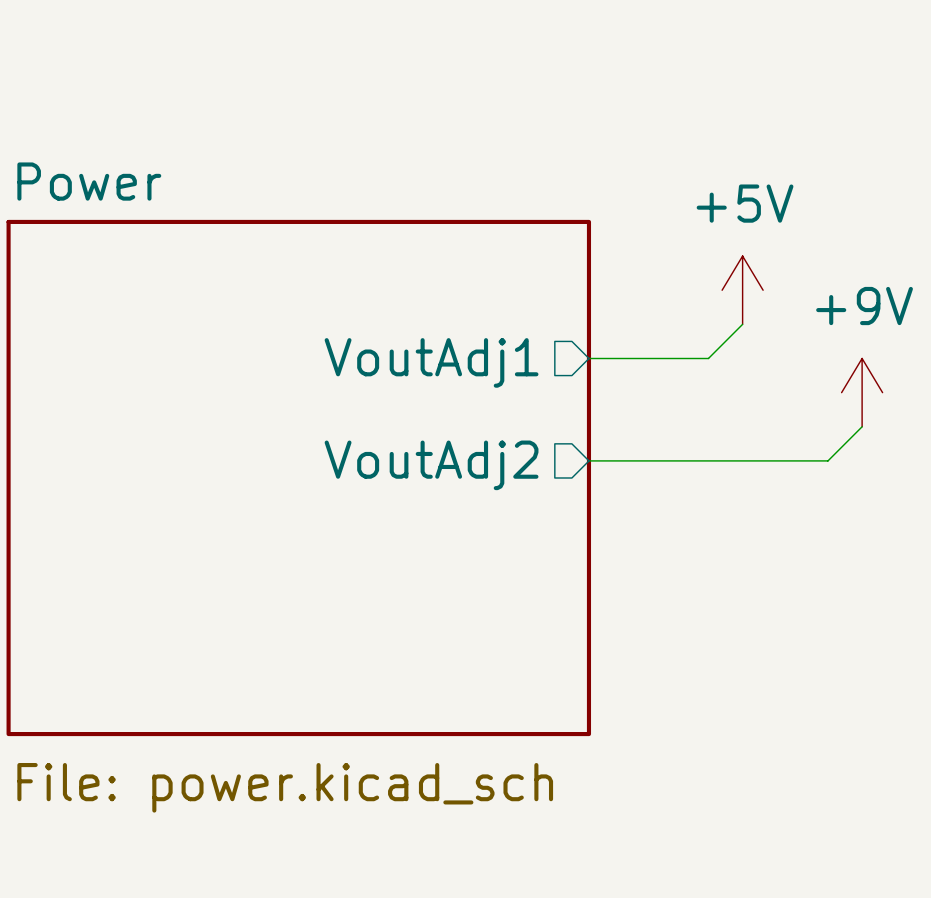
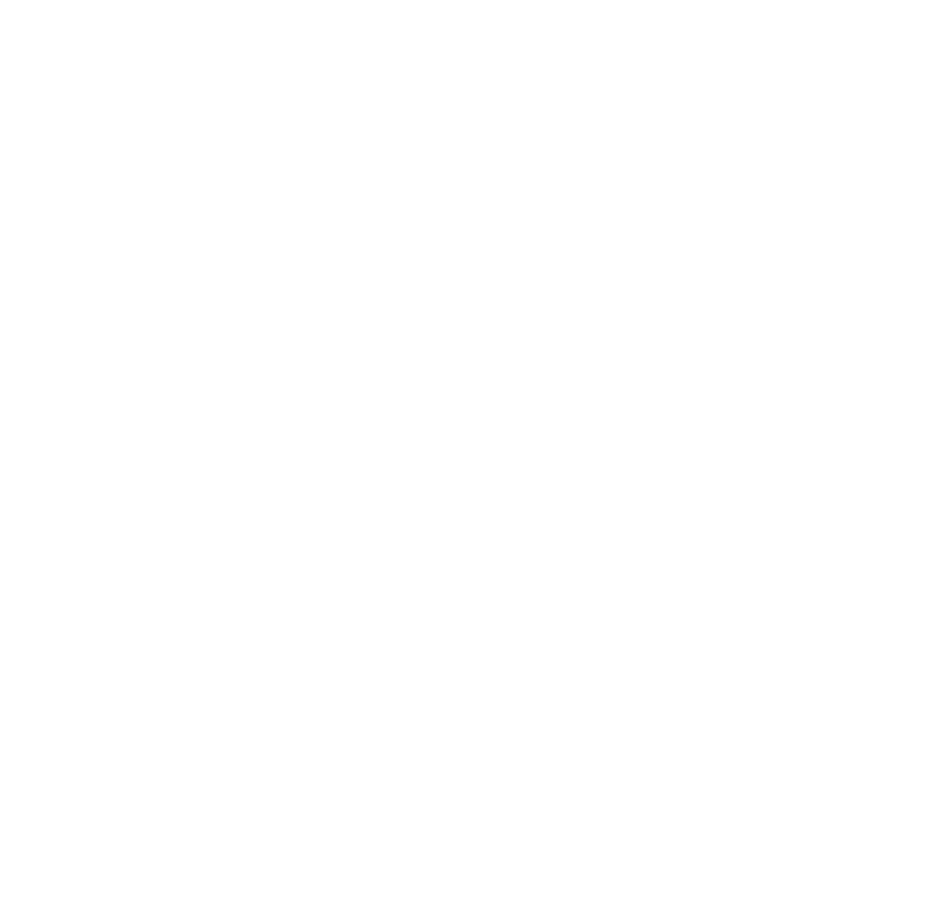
power symbol: +5V (742, 290) -> none
wire: (742, 324) (708, 358) (588, 358) -> none
sheet pin: VoutAdj1 (431, 362) -> none
power symbol: +9V (862, 392) -> none
wire: (862, 426) (827, 460) (588, 460) -> none
sheet pin: VoutAdj2 (431, 465) -> none
sheet Power: File: power.kicad_sch (298, 477) -> none

